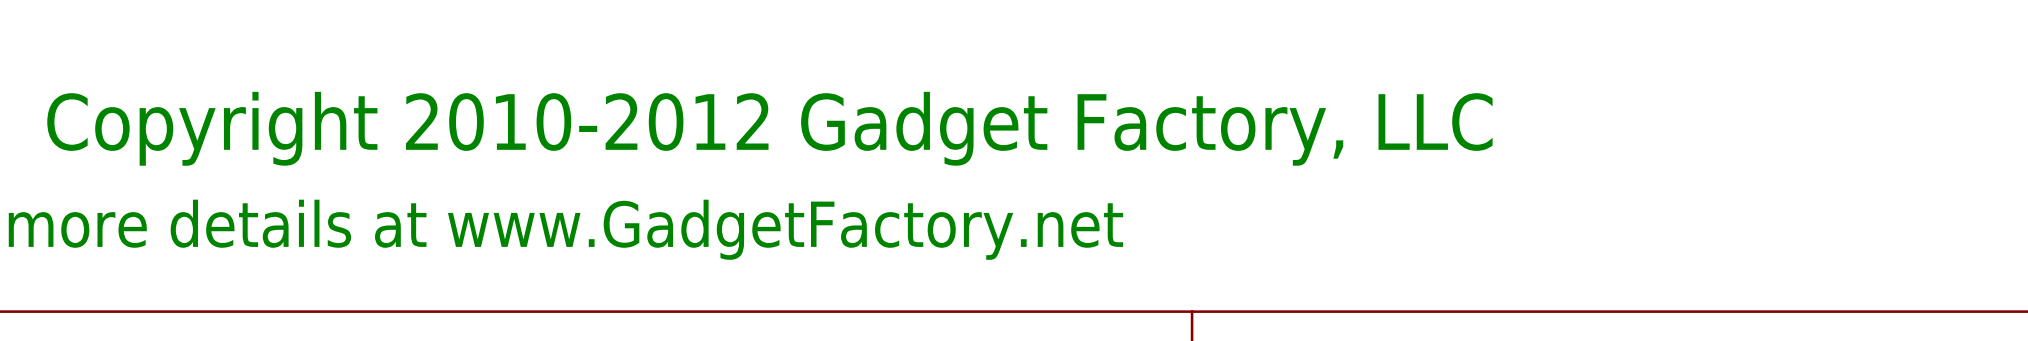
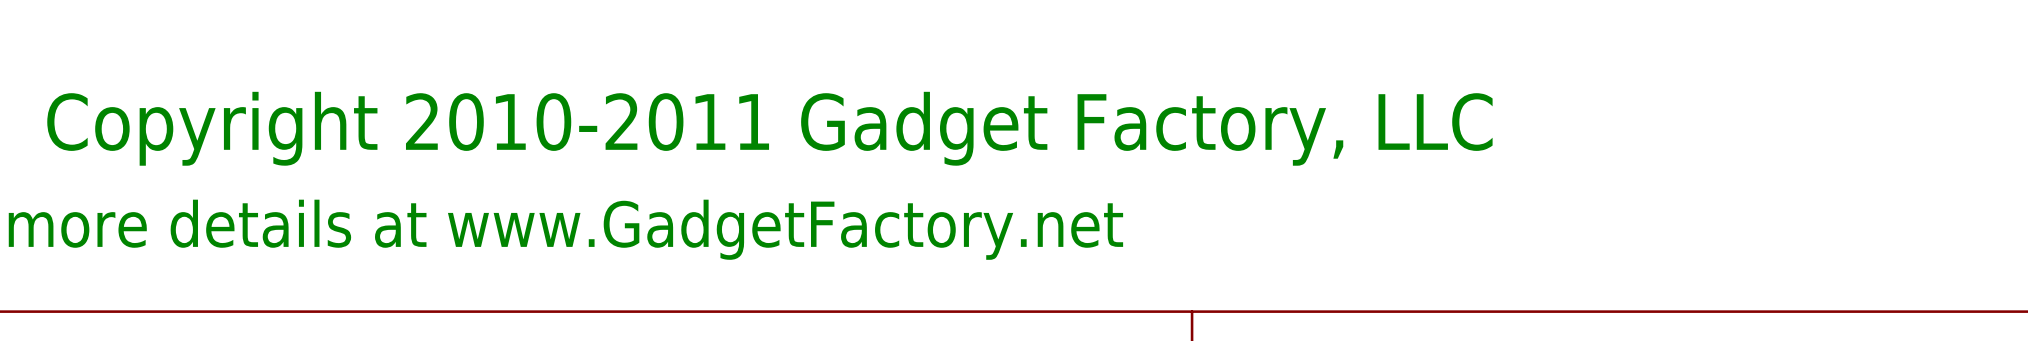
text: Copyright 2010-2012 Gadget Factory, LLC (769, 128) -> Copyright 2010-2011 Gadget Factory, LLC (769, 128)

